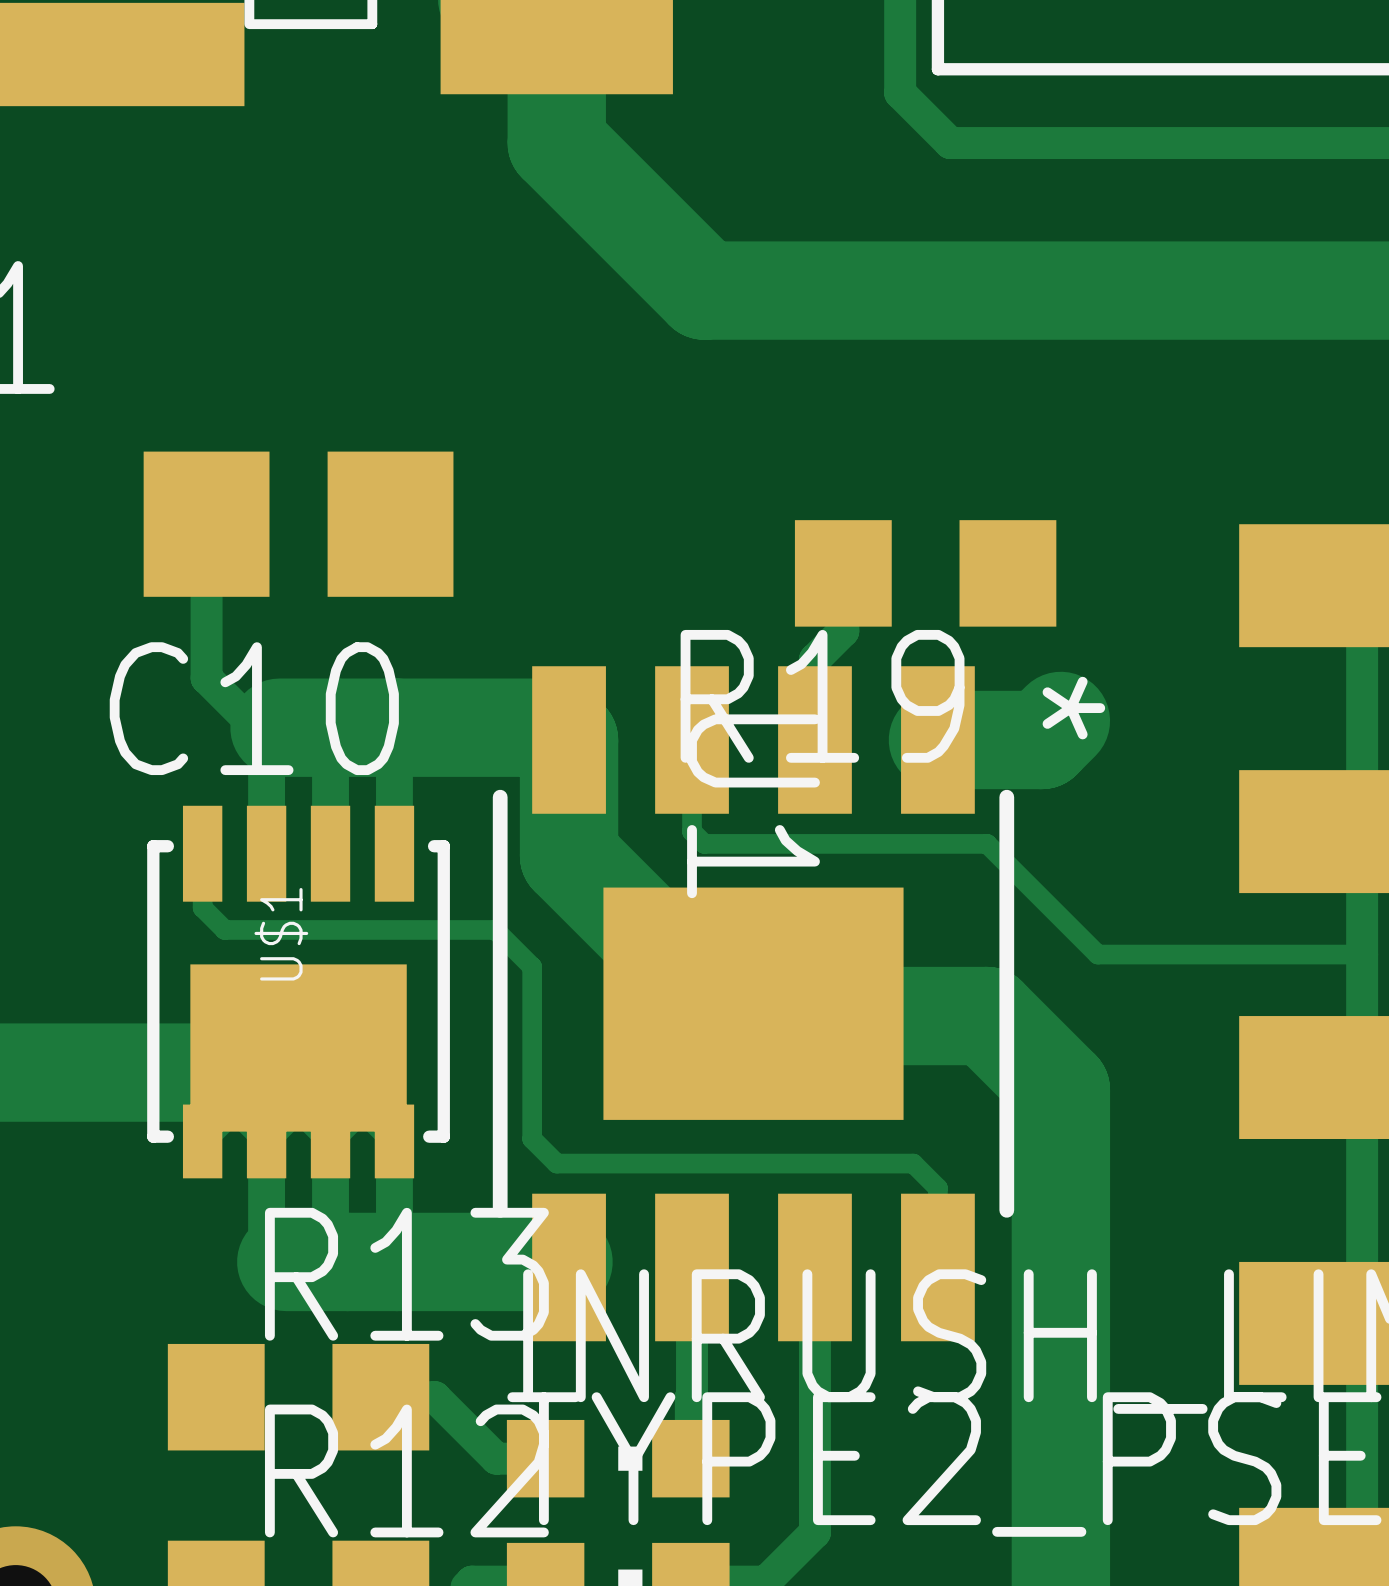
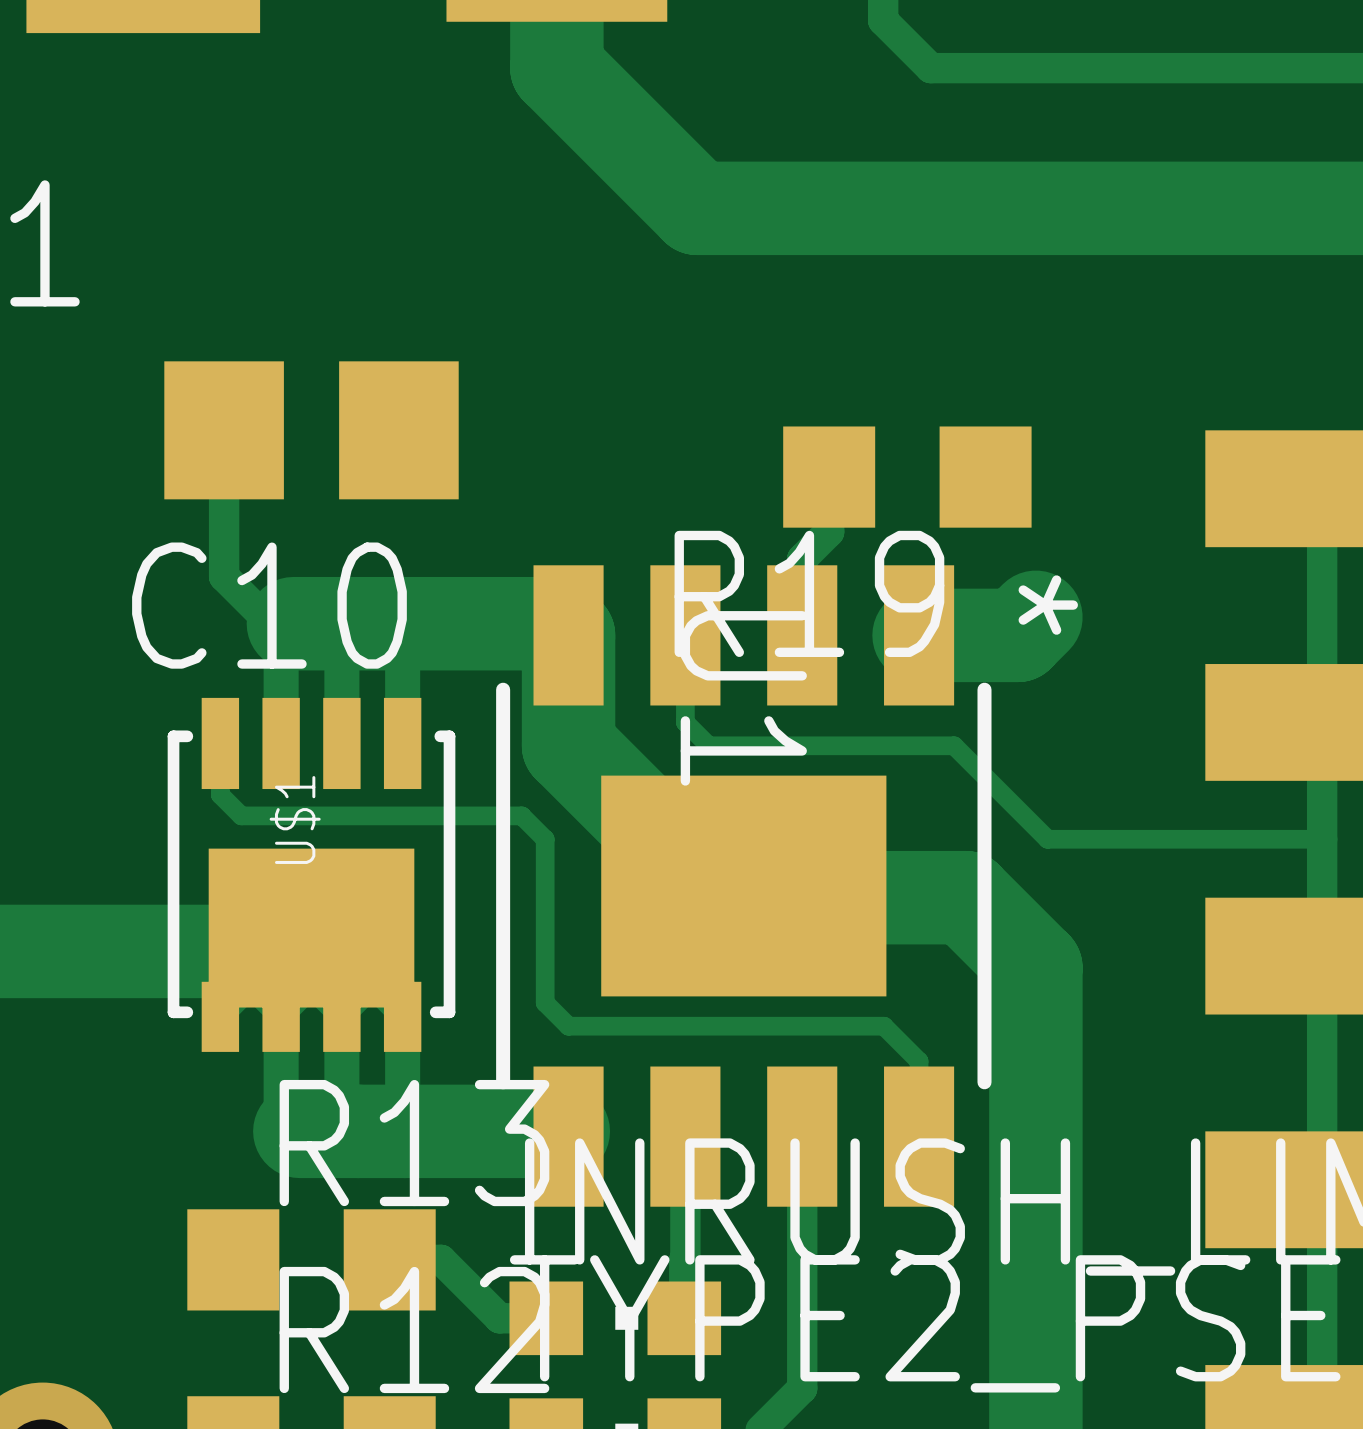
track: (704, 843) (987, 843) (1097, 954) -> (697, 734) (708, 745) (954, 745) (1047, 839) (1070, 839)
track: (495, 929) (532, 966) (532, 1138) (556, 1163) (913, 1163) -> (498, 815) (521, 815) (545, 839) (545, 1002) (568, 1026) (884, 1026) (895, 1037)

